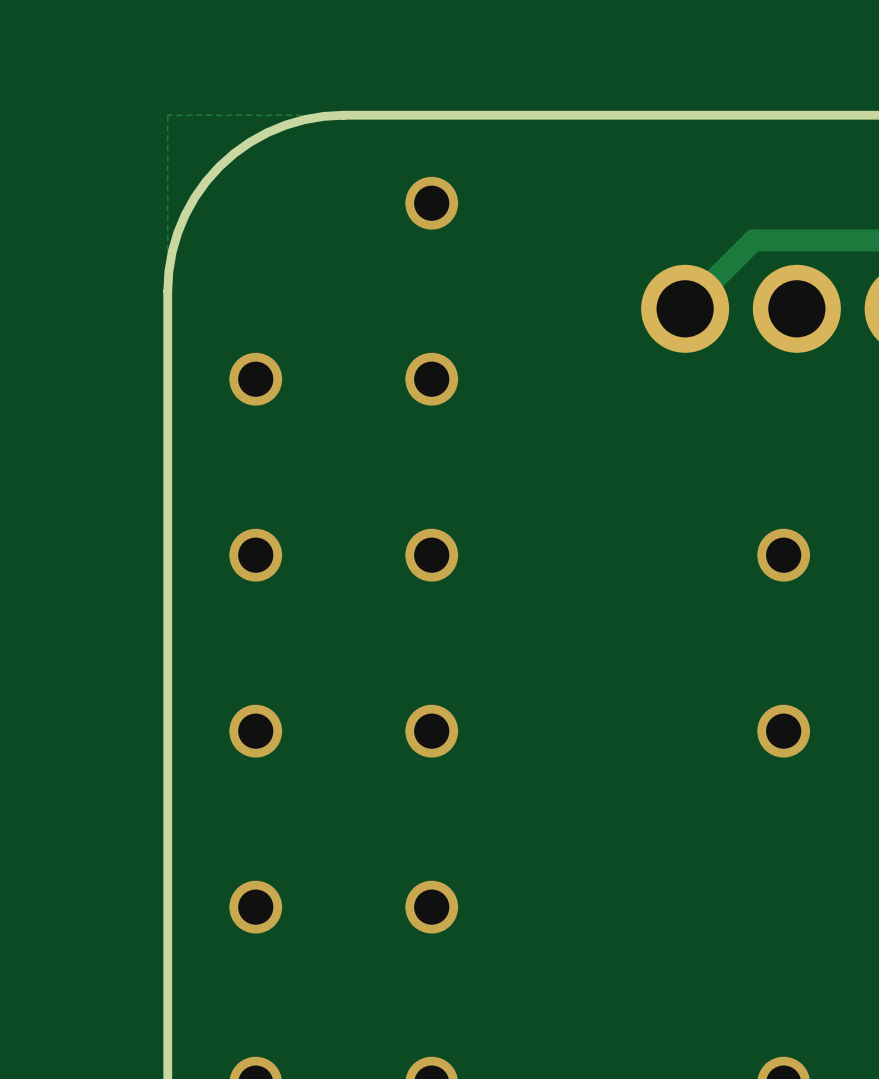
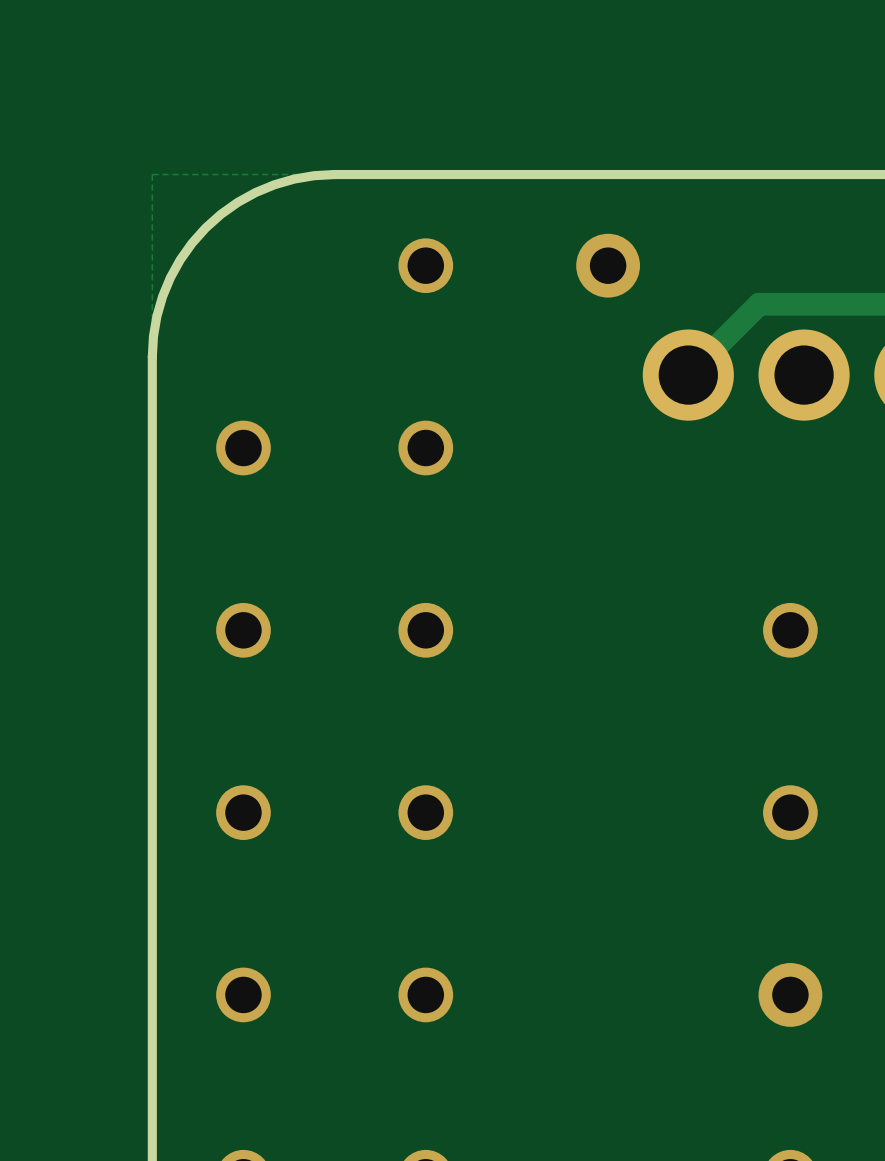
via: none -> (608, 265)
via: none -> (790, 994)

